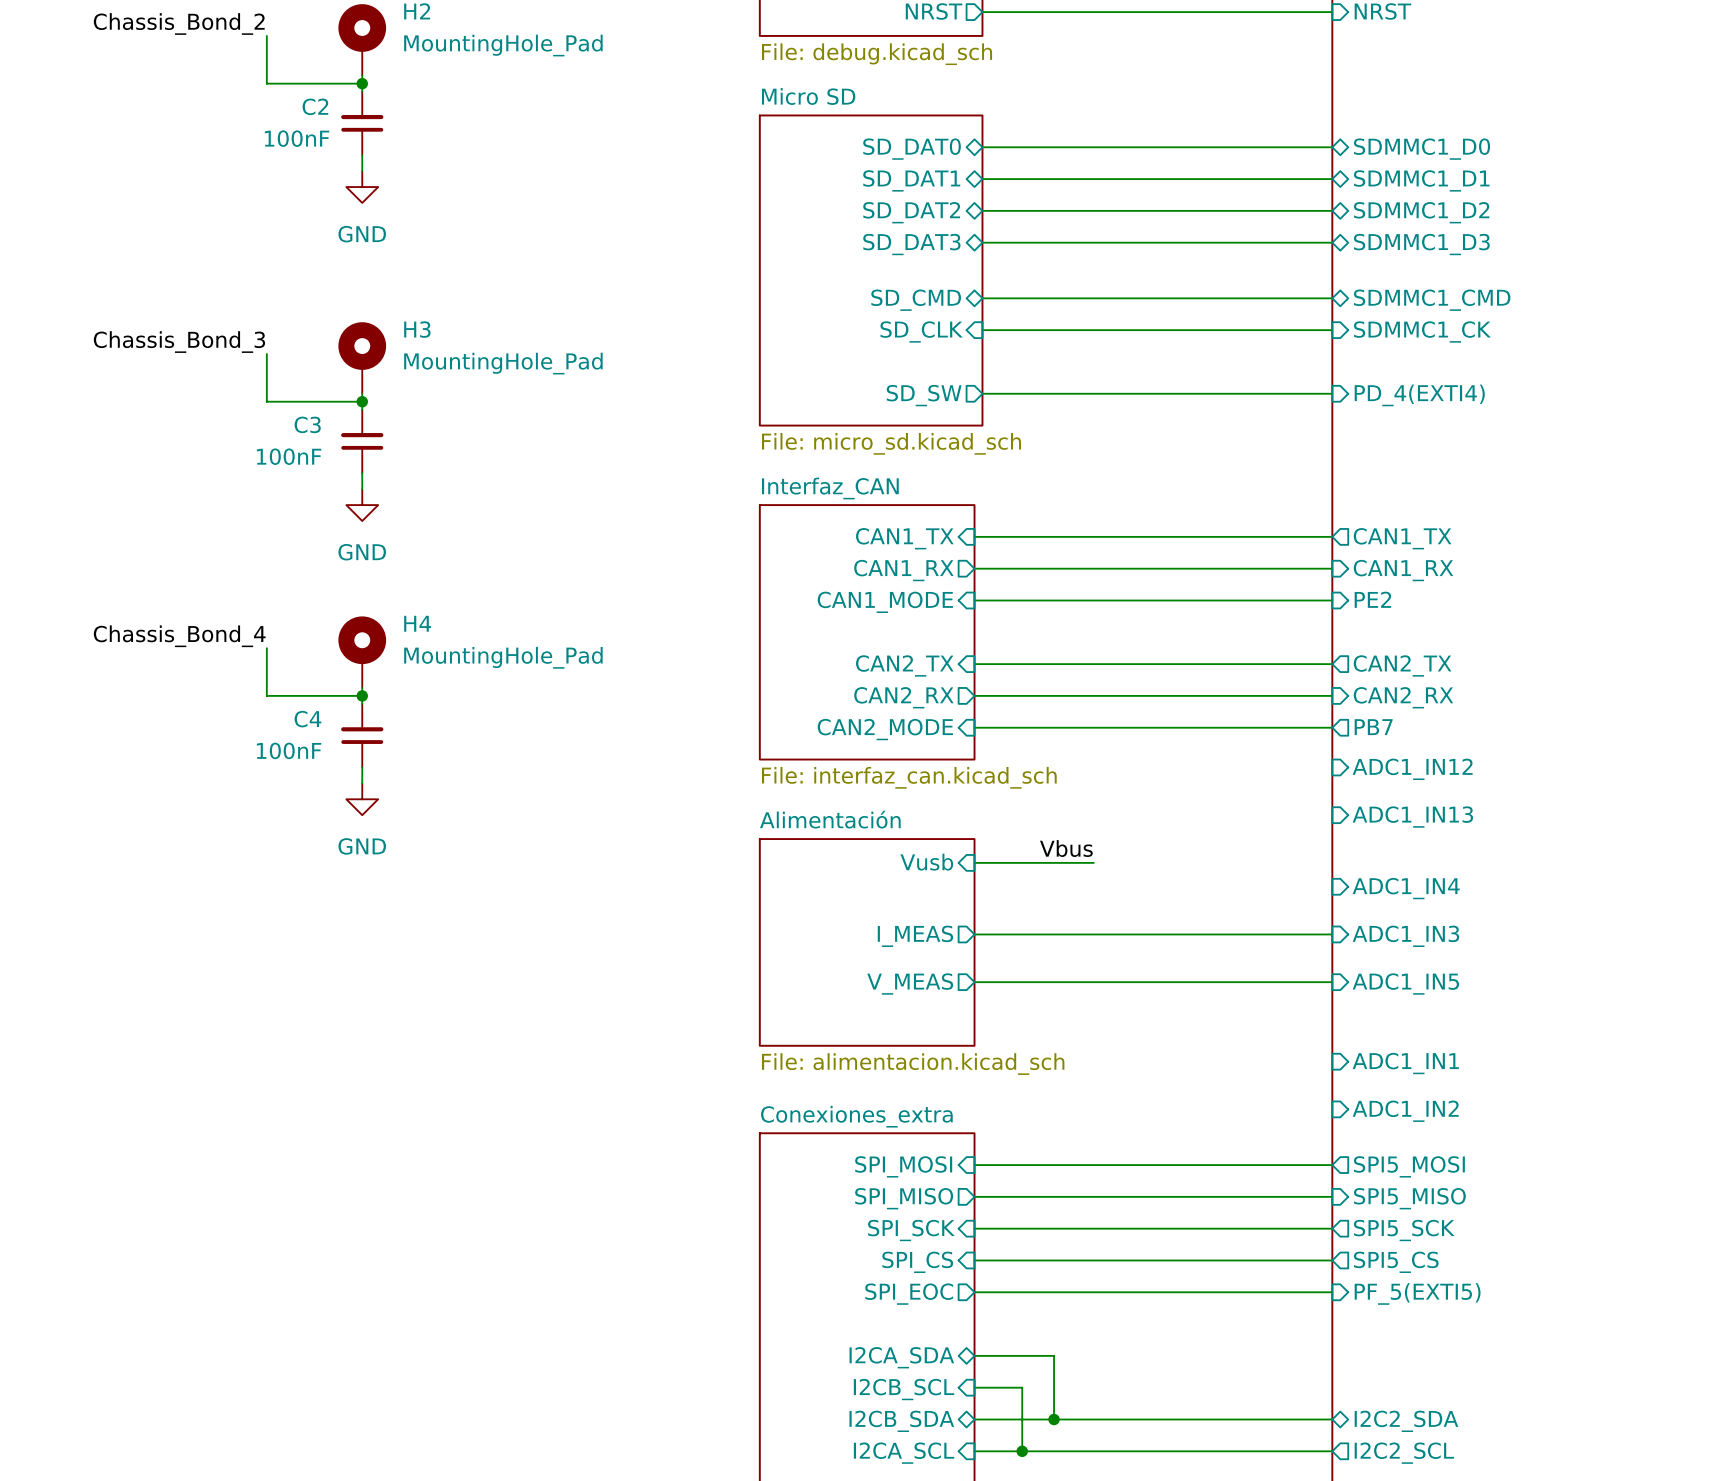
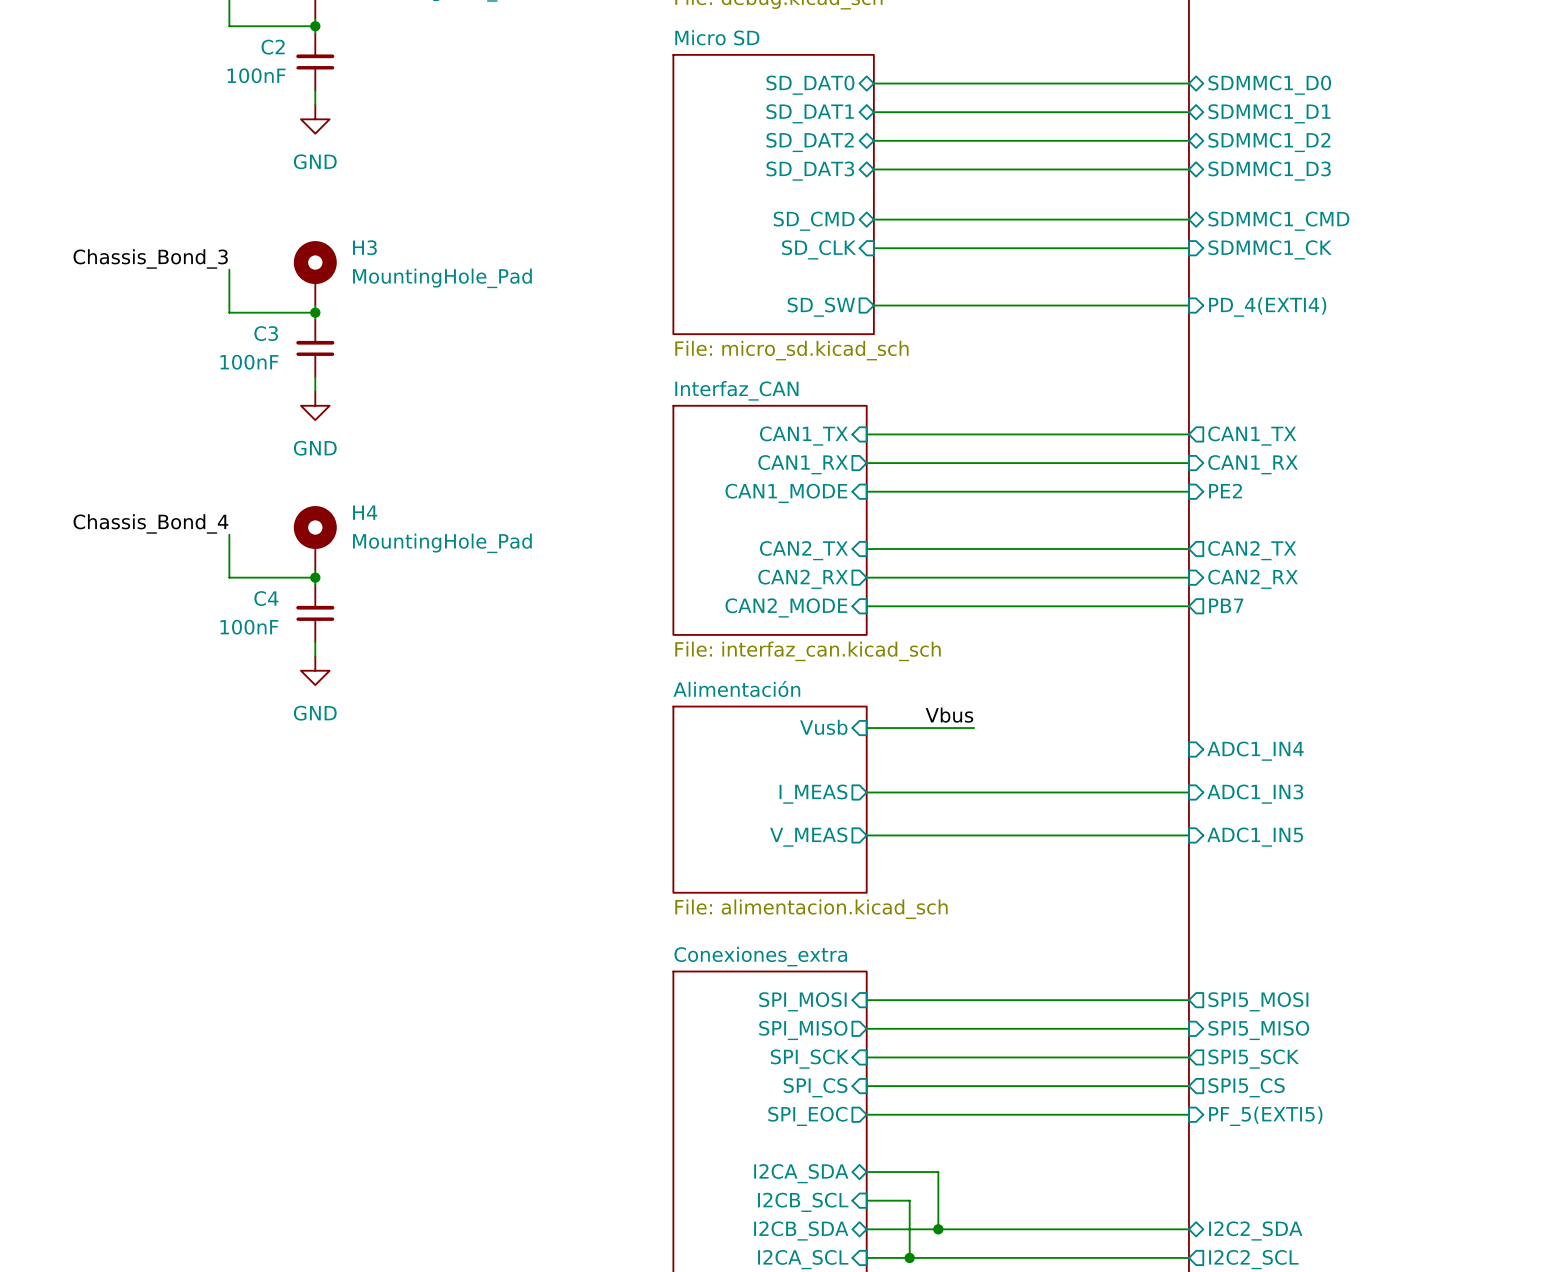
sheet pin: ADC1_IN12 (1412, 769) -> none
sheet pin: ADC1_IN13 (1412, 817) -> none
sheet pin: ADC1_IN1 (1405, 1063) -> none
sheet pin: ADC1_IN2 (1405, 1111) -> none

